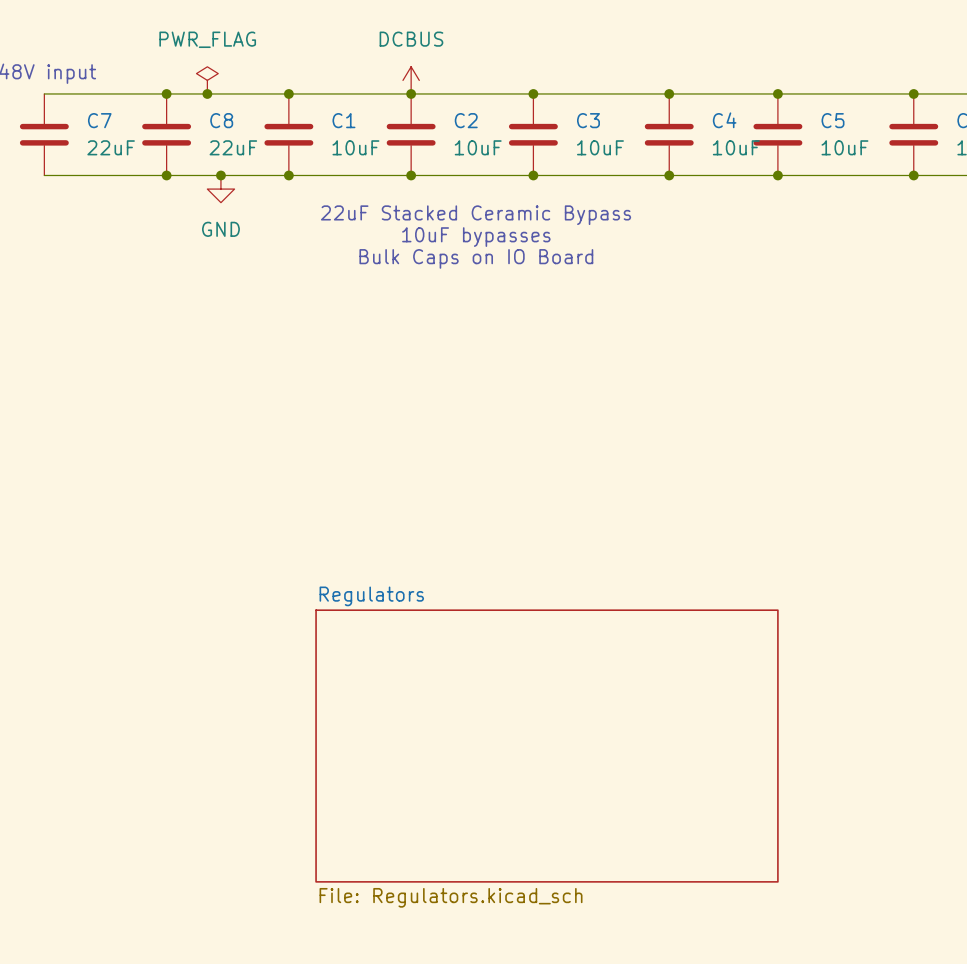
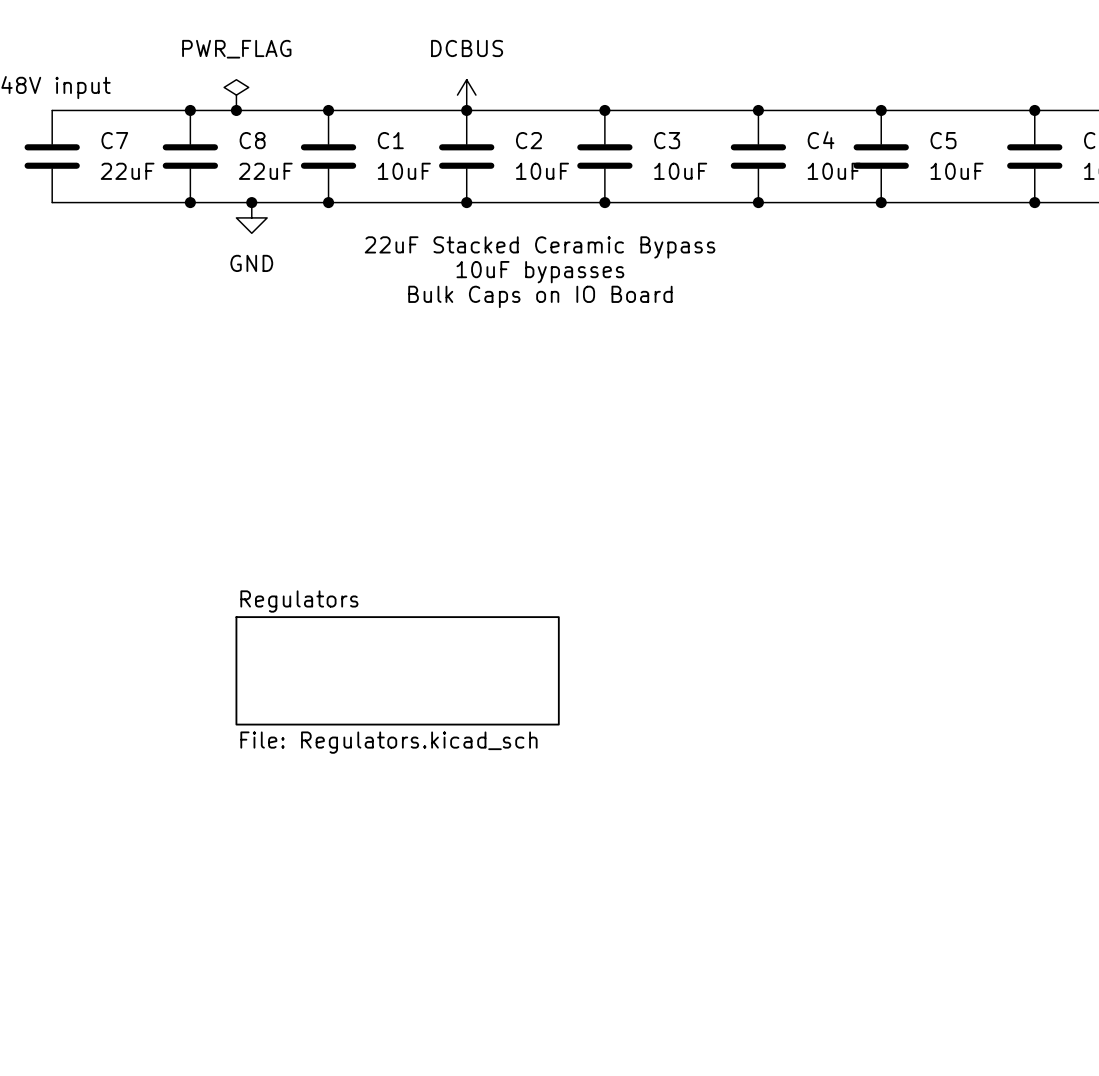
sheet Regulators: none -> File: Regulators.kicad_sch (397, 670)
sheet Regulators: File: Regulators.kicad_sch (546, 746) -> none

